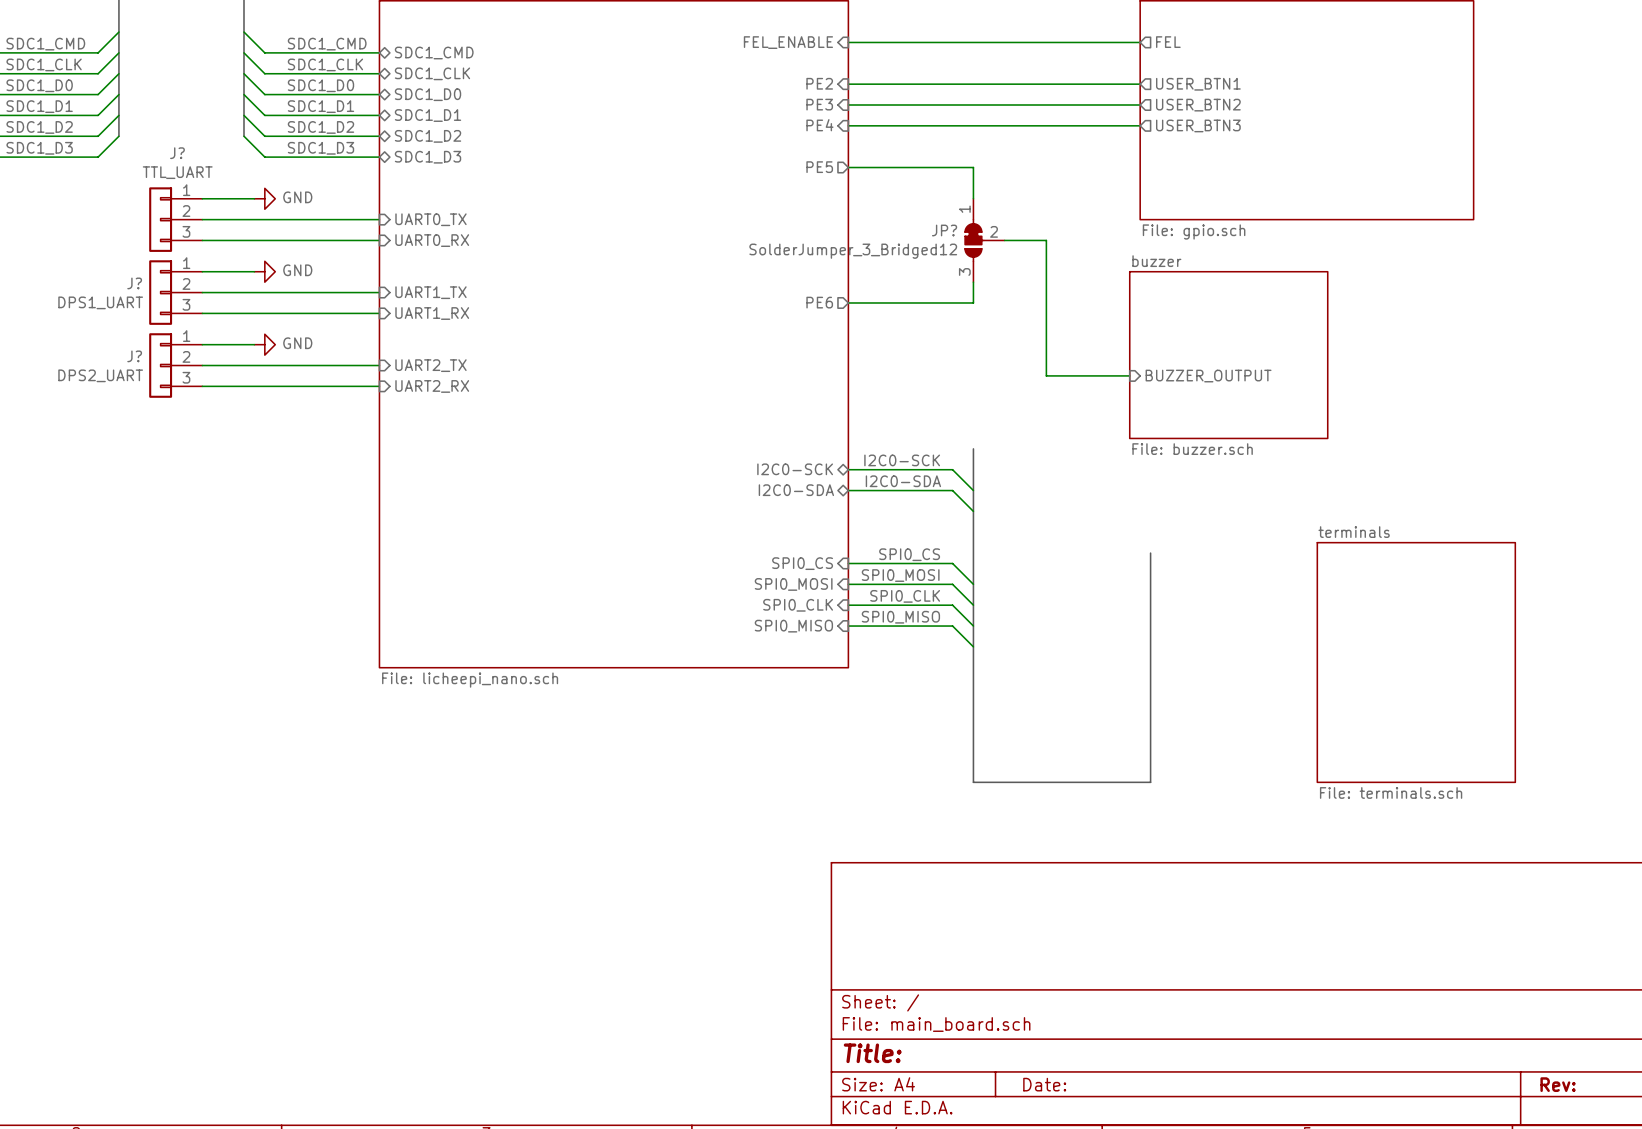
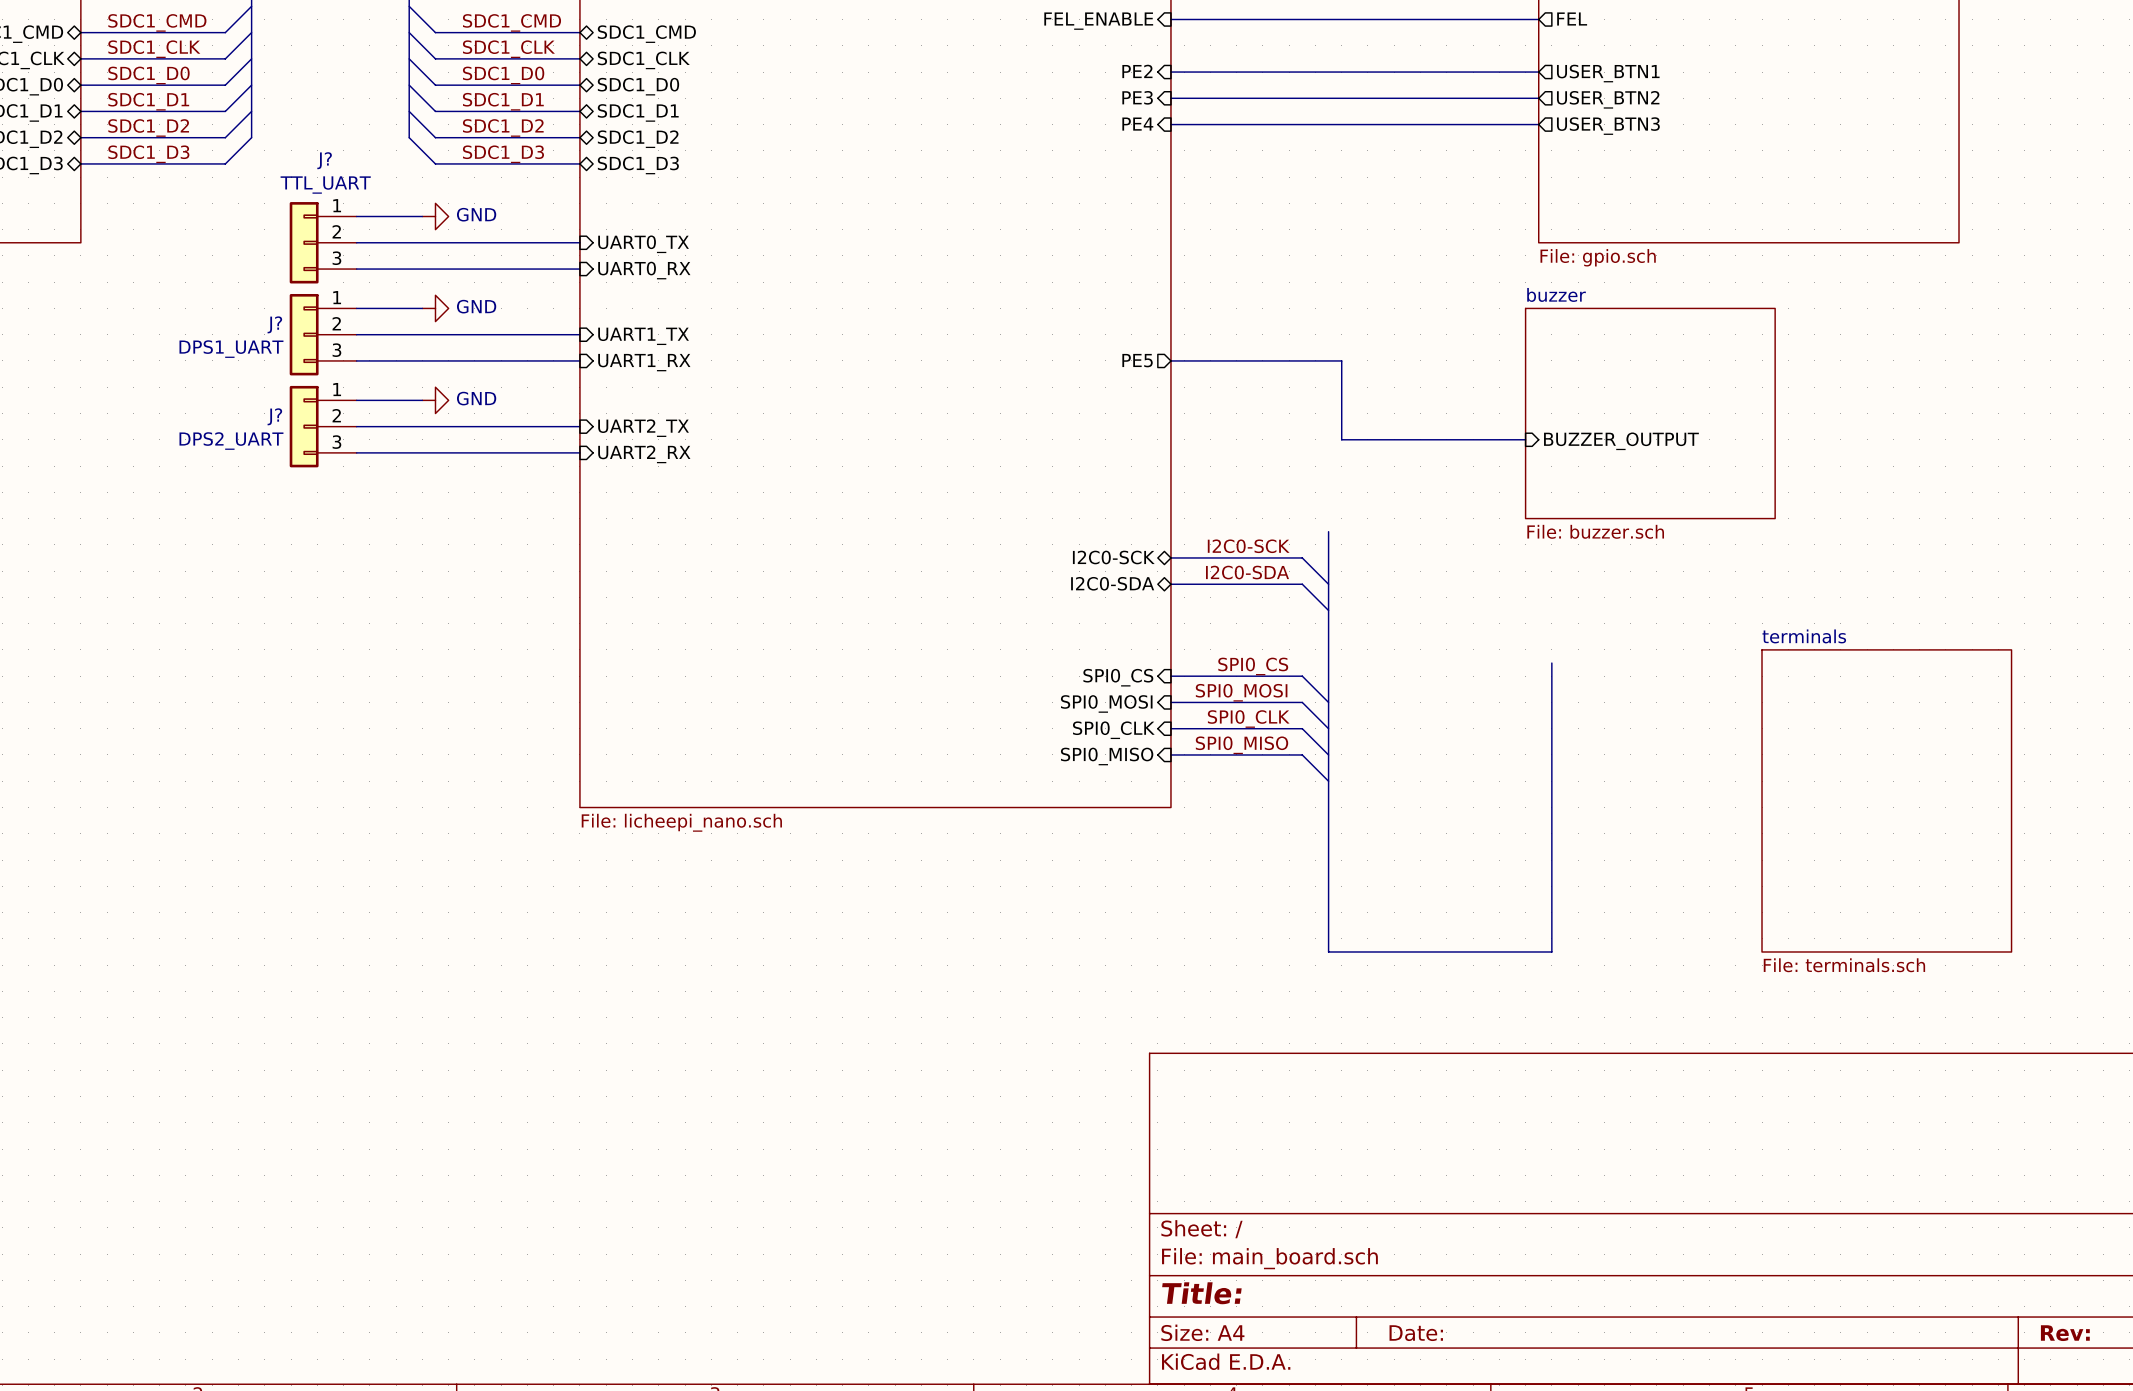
sheet pin position: PE5 (819, 167) -> PE5 (1137, 360)
wire: (848, 167) (973, 167) (973, 198) -> none
JP?: SolderJumper_3_Bridged12 (984, 240) -> none
wire: (1004, 240) (1046, 240) (1046, 375) -> (1170, 360) (1341, 360) (1341, 439) (1420, 439)
wire: (973, 282) (973, 302) (848, 302) -> none
sheet pin: PE6 (819, 302) -> none

